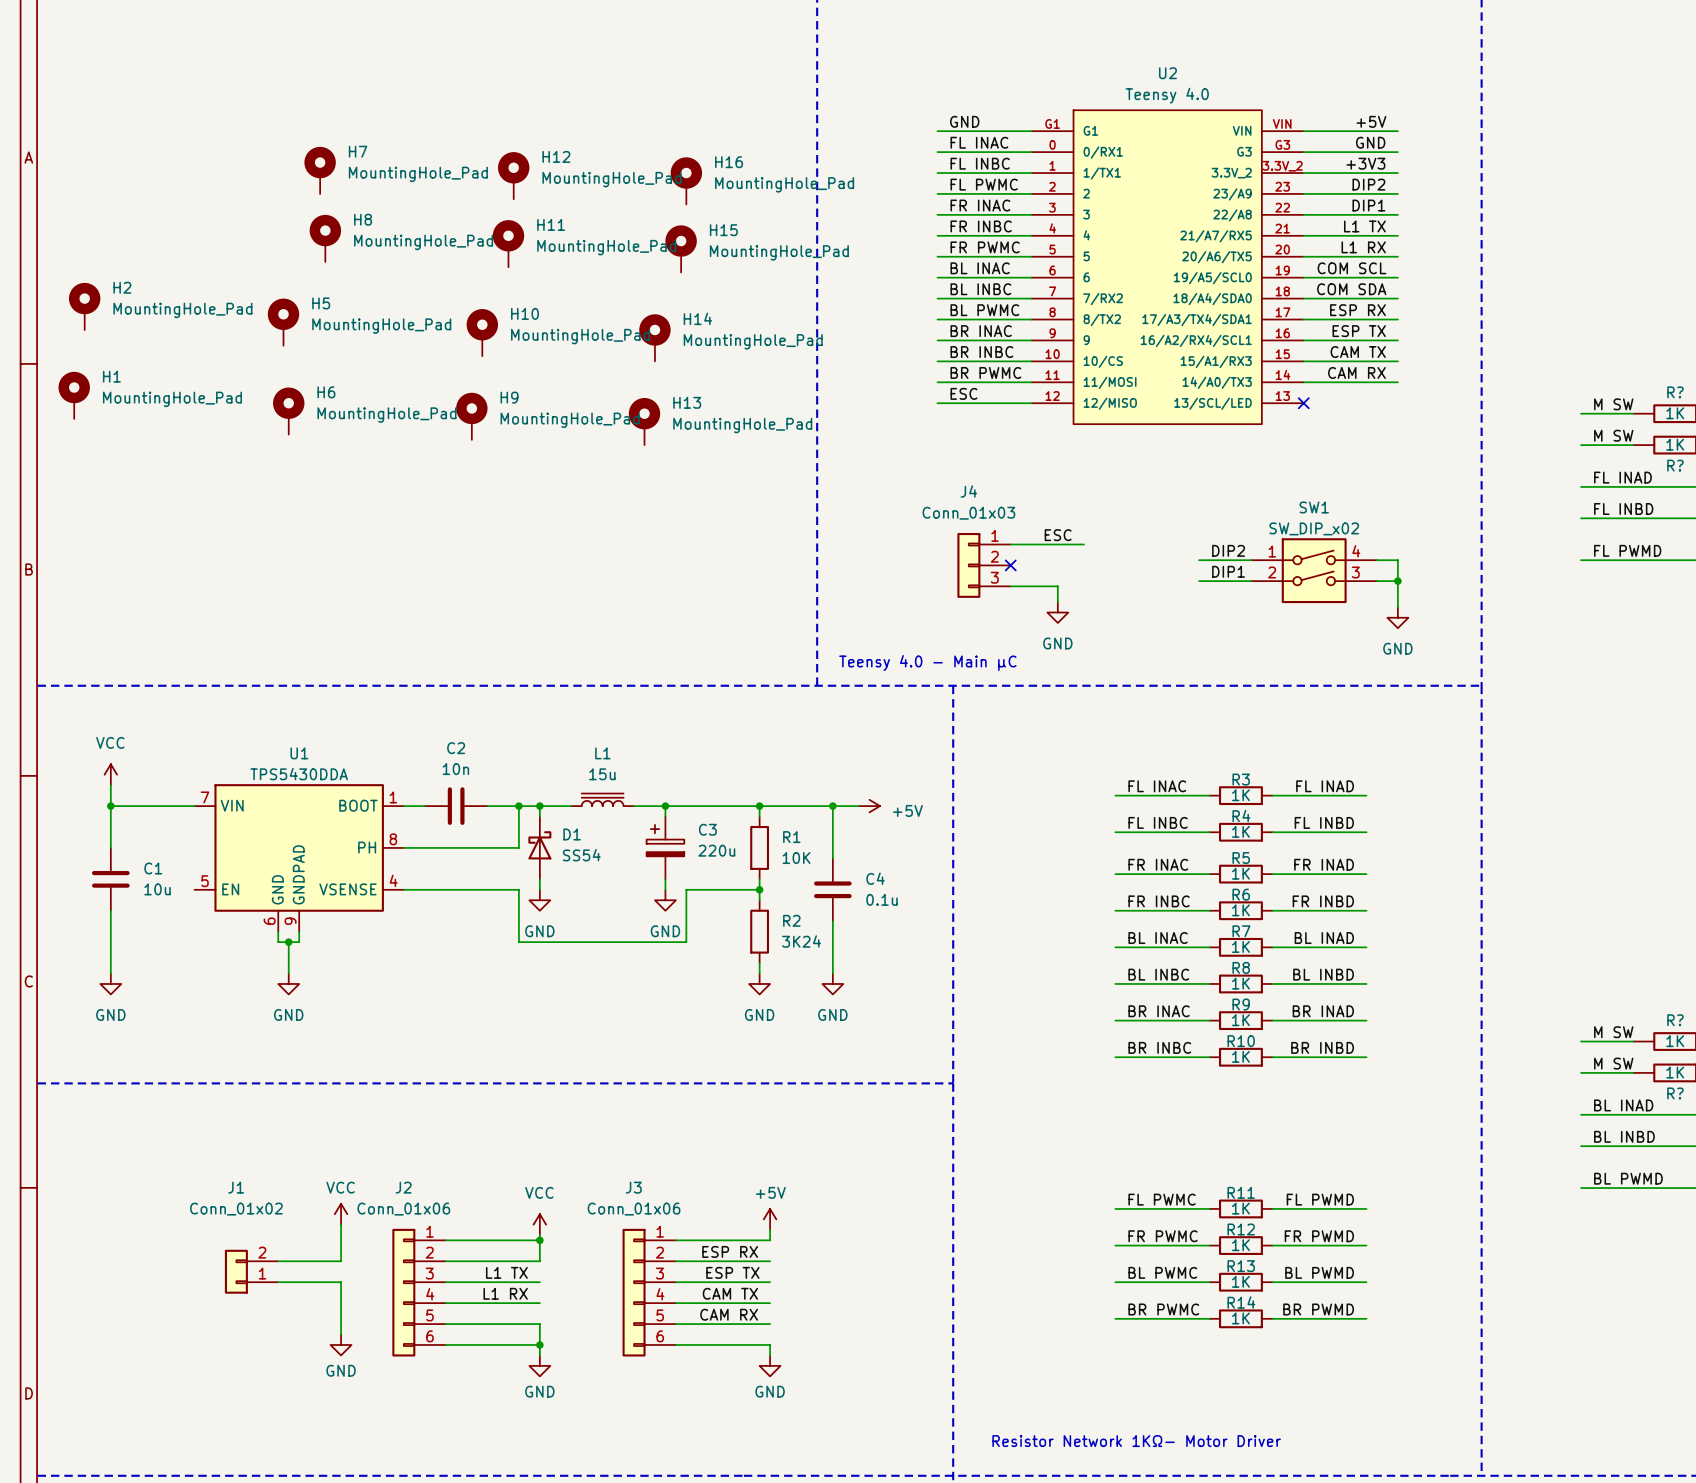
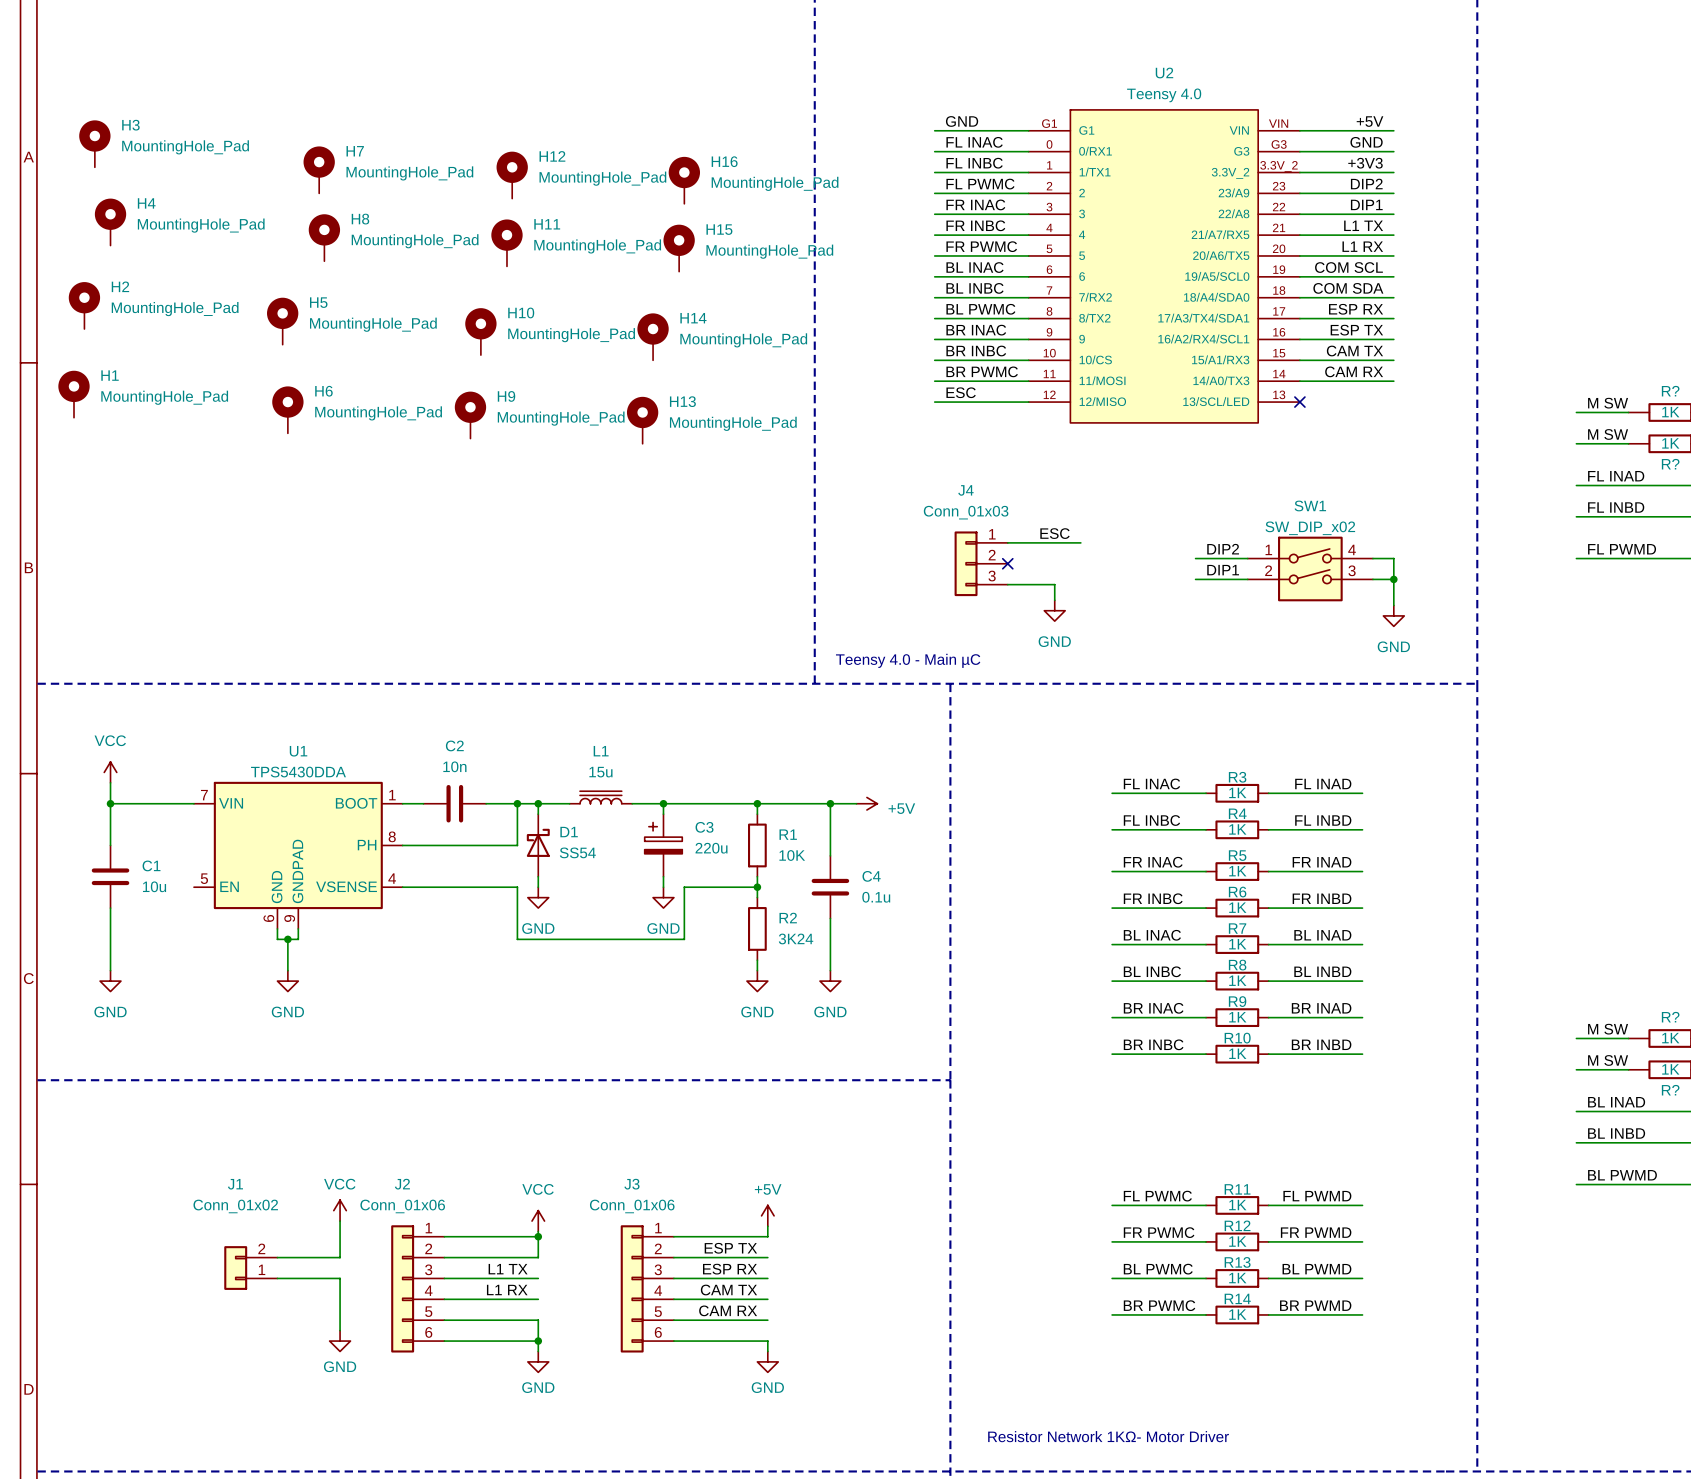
H3: none -> MountingHole_Pad (94, 143)
H4: none -> MountingHole_Pad (110, 222)
label: ESP RX (730, 1251) -> ESP TX (730, 1248)
label: ESP TX (732, 1272) -> ESP RX (730, 1269)

